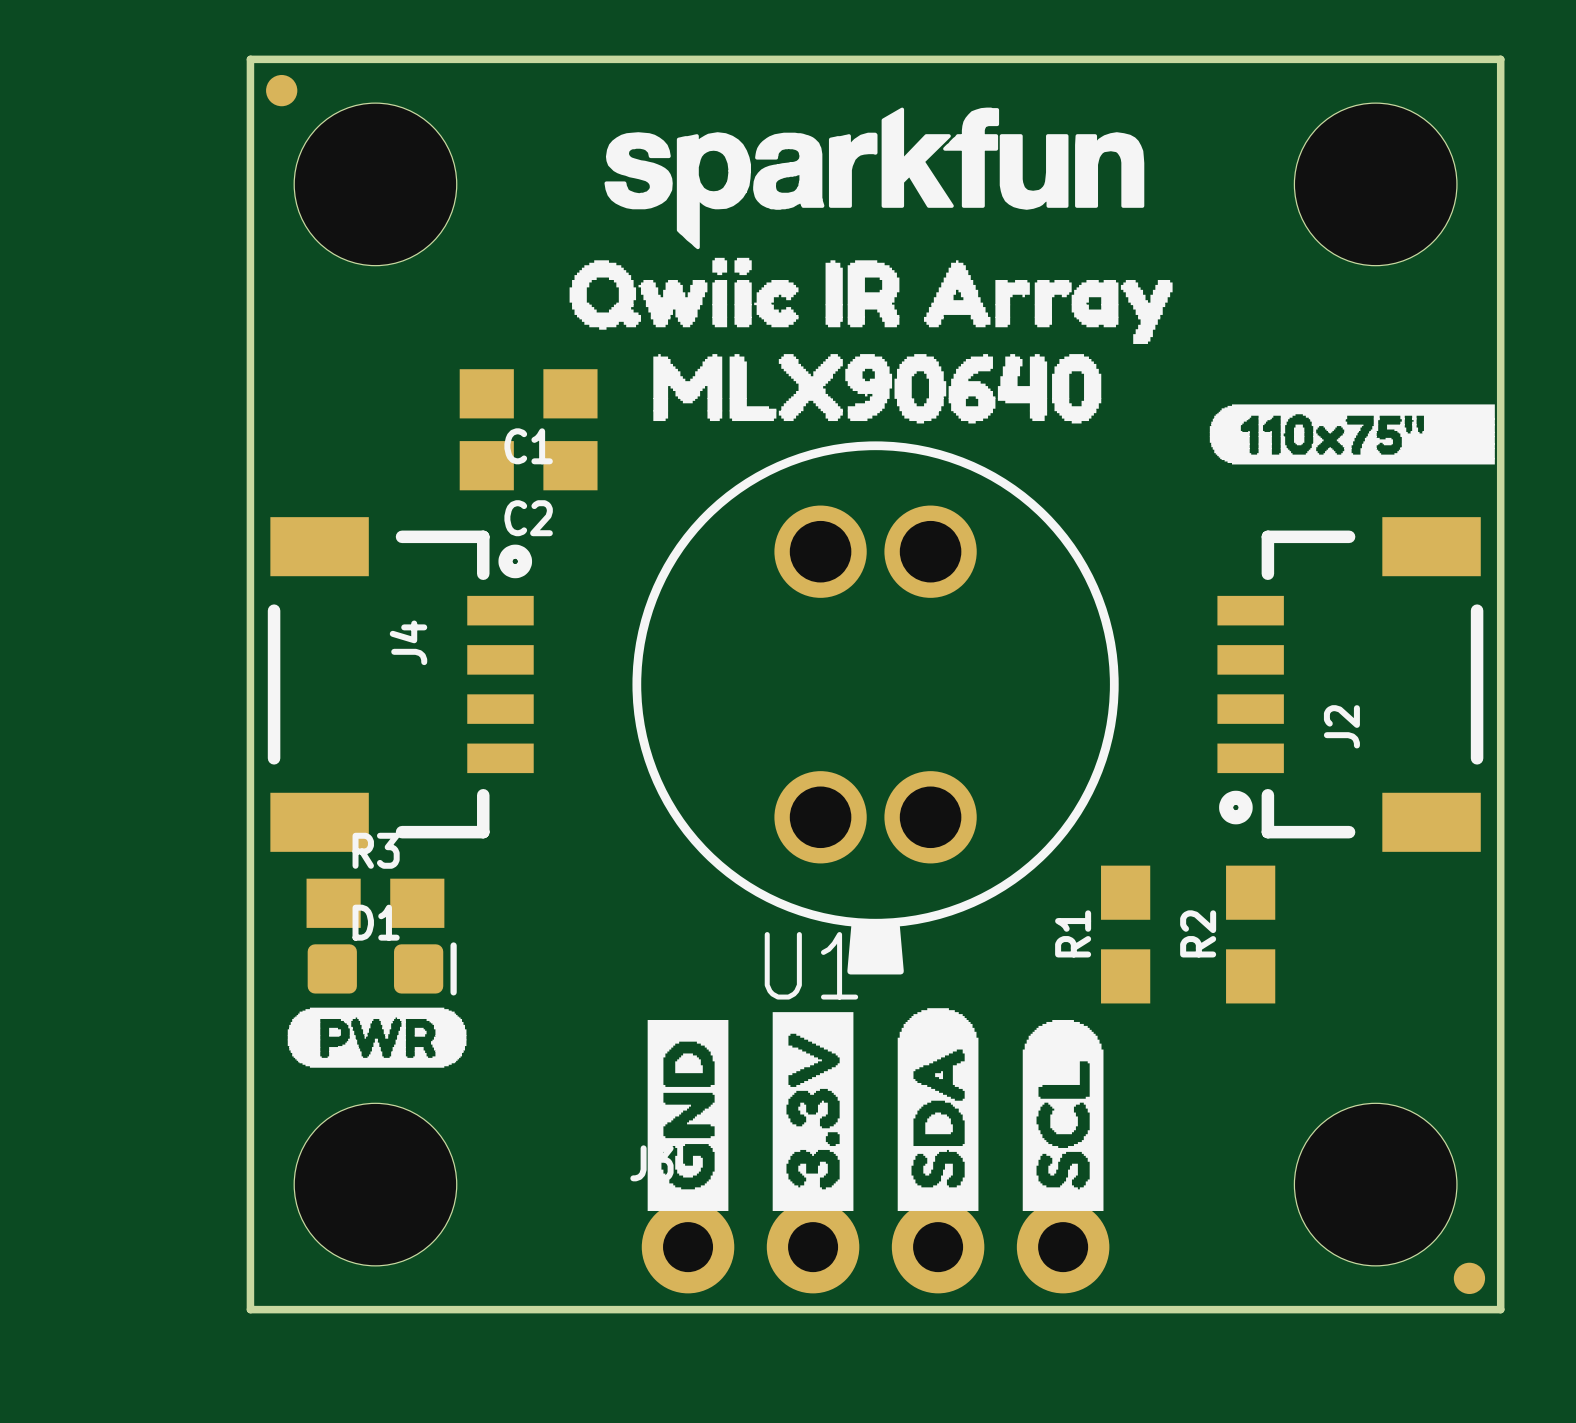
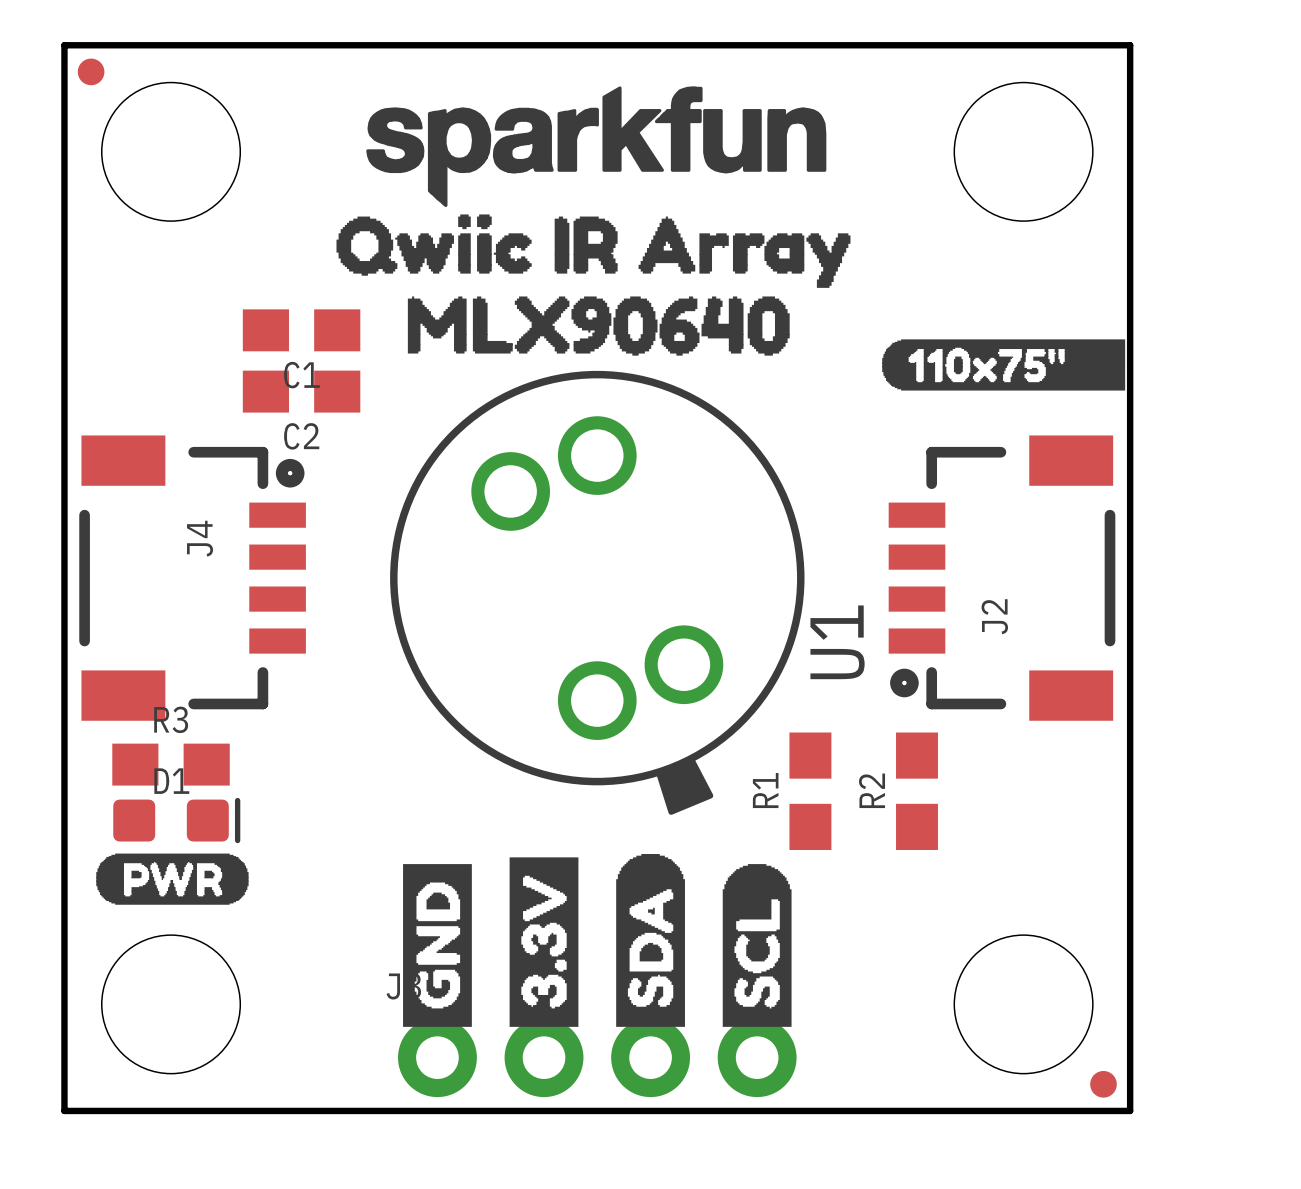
U1 footprint: [632, 441, 1119, 975] -> [390, 370, 805, 815]
U1 name position: U1 (811, 965) -> U1 (837, 642)

